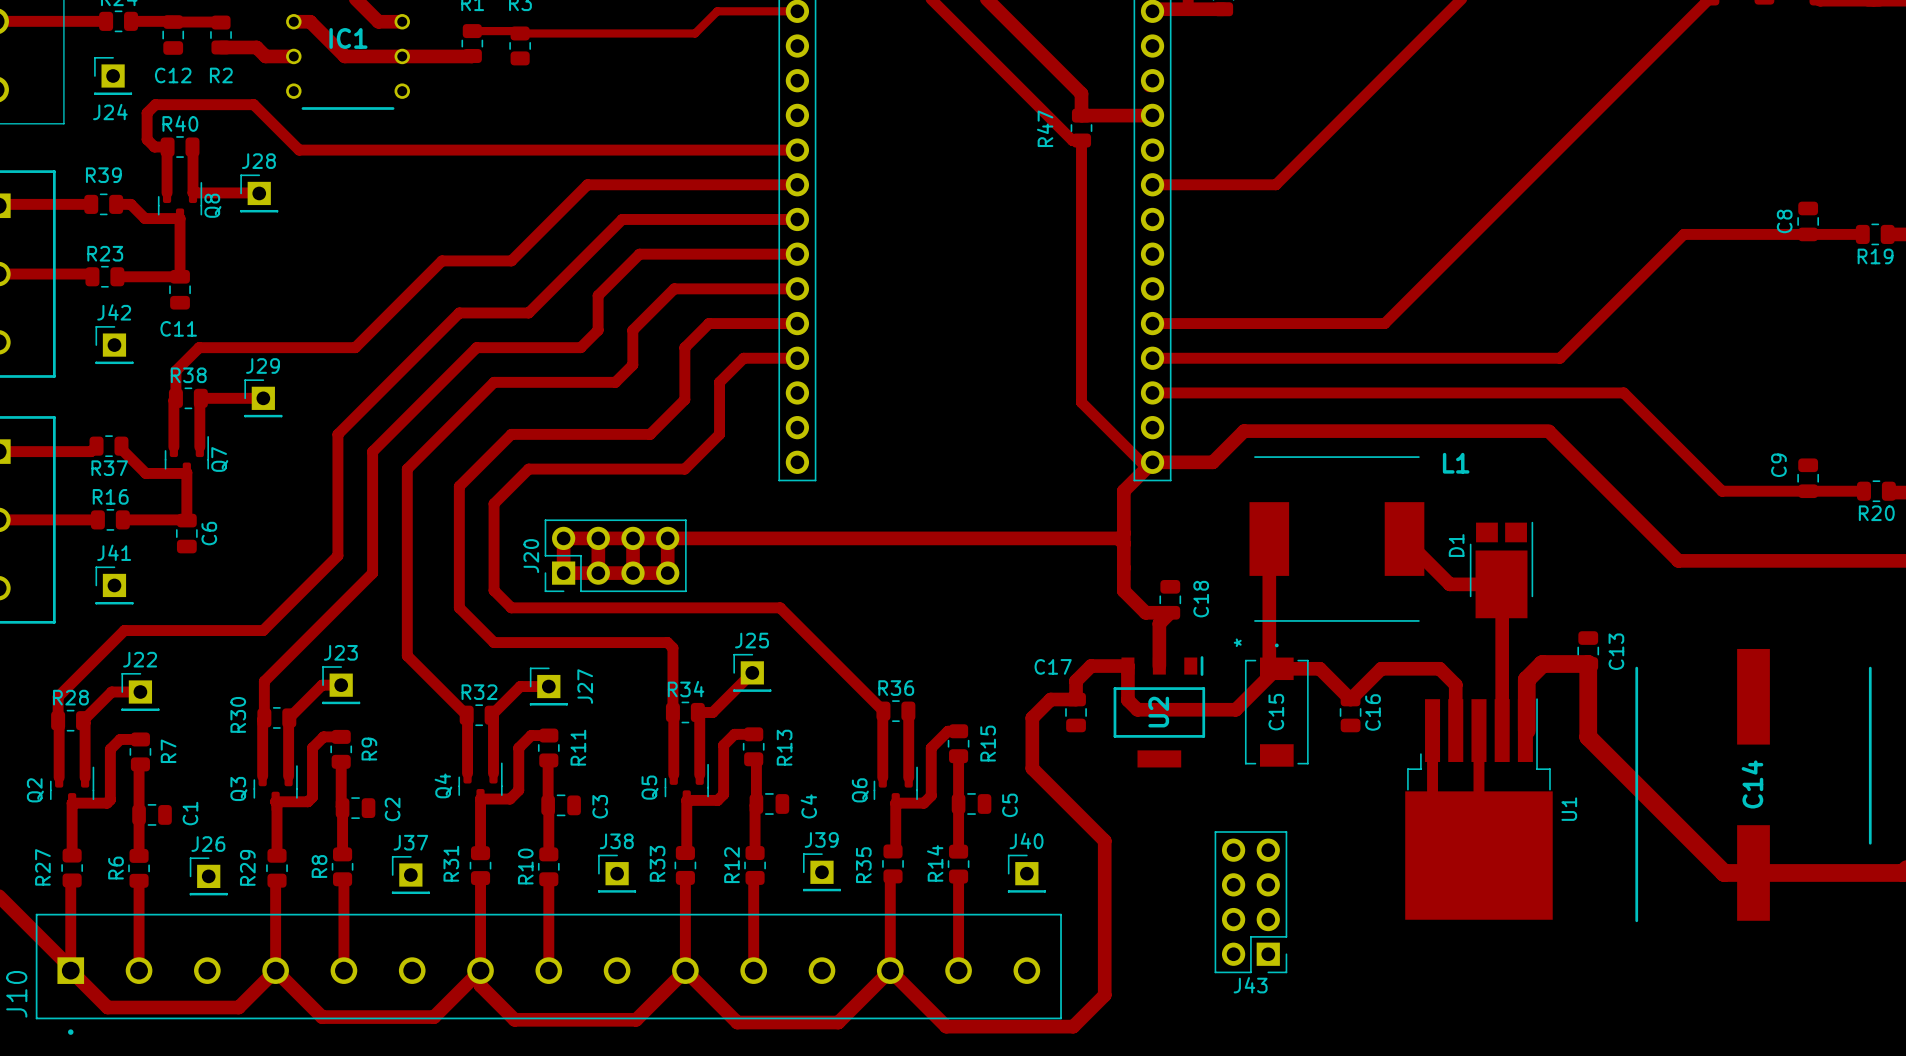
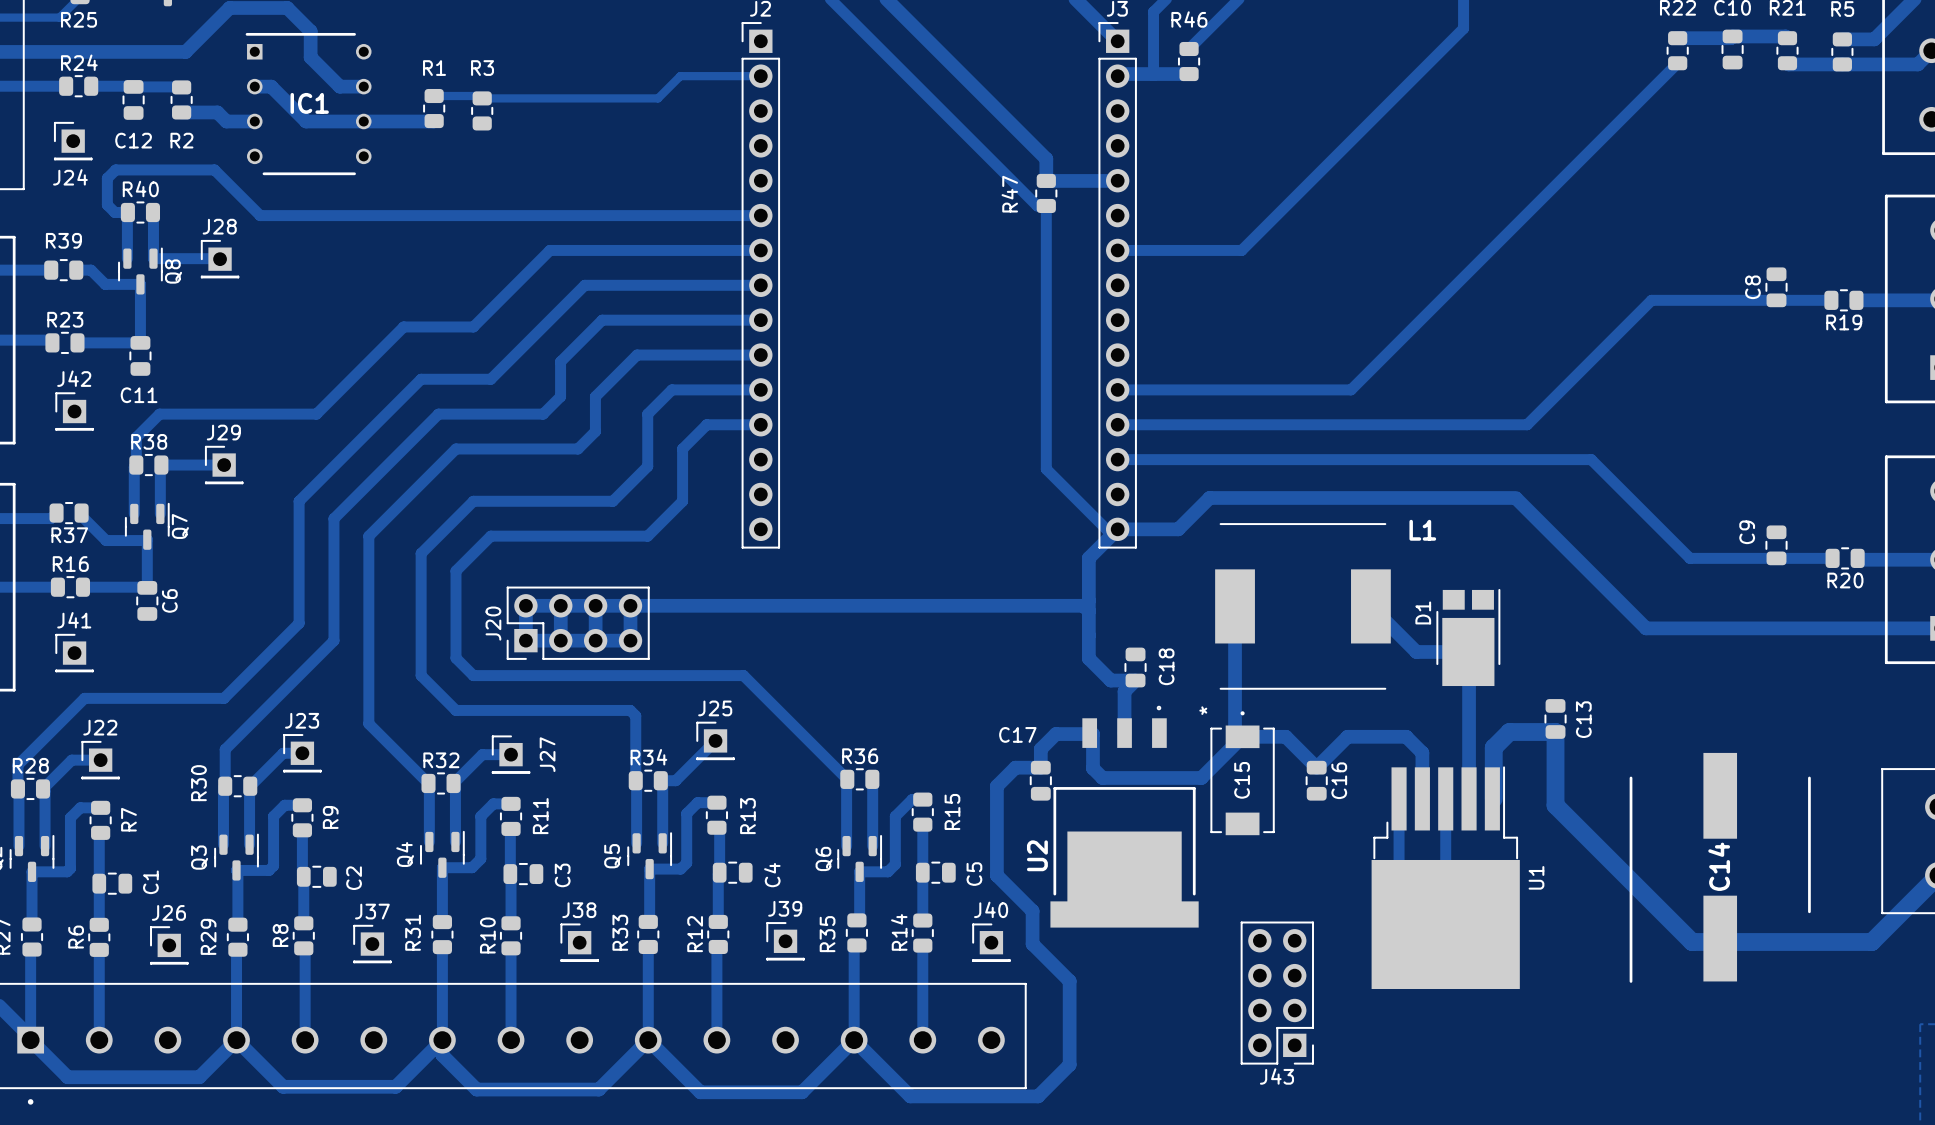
C14 footprint: [1635, 648, 1872, 923] -> [1629, 752, 1811, 983]
U2 footprint: [1113, 656, 1206, 768] -> [1050, 705, 1199, 928]
U2 name position: U2 (1158, 712) -> U2 (1037, 855)
track: (1032, 768) (1104, 840) (1104, 911) -> (996, 837) (996, 875) (1032, 911) (1032, 944) (1069, 981)
J43 position: (1250, 902) -> (1277, 993)

